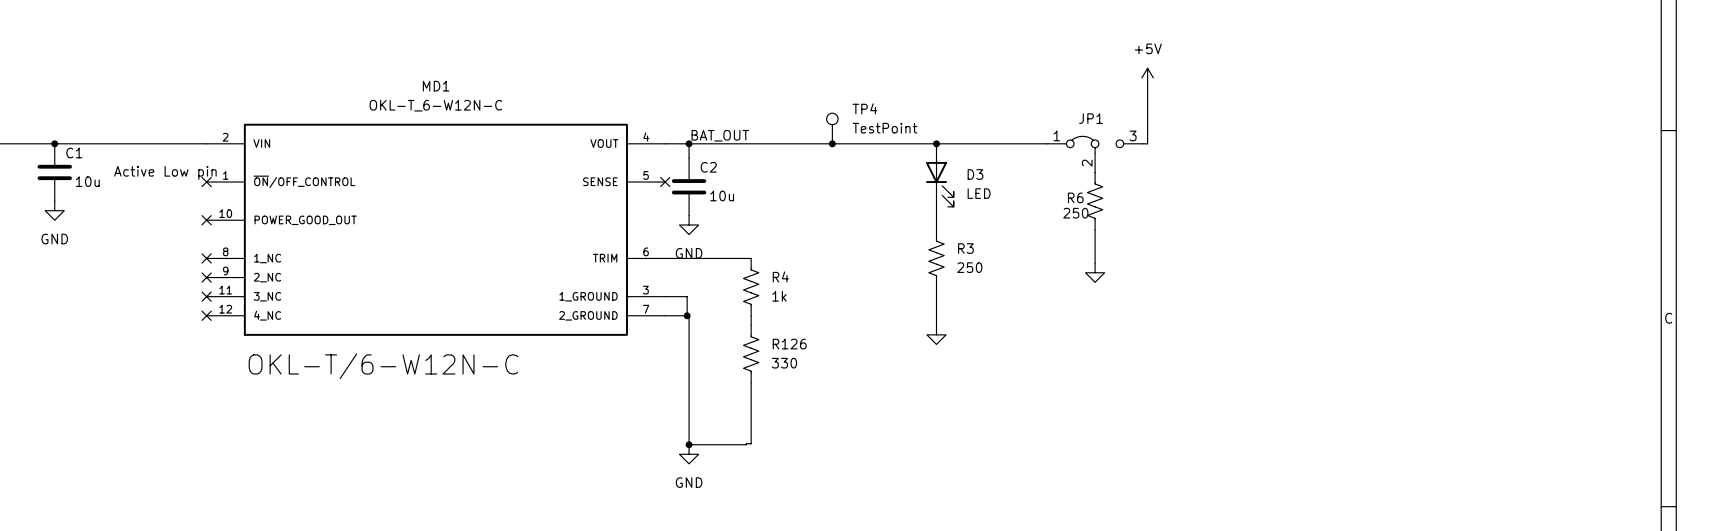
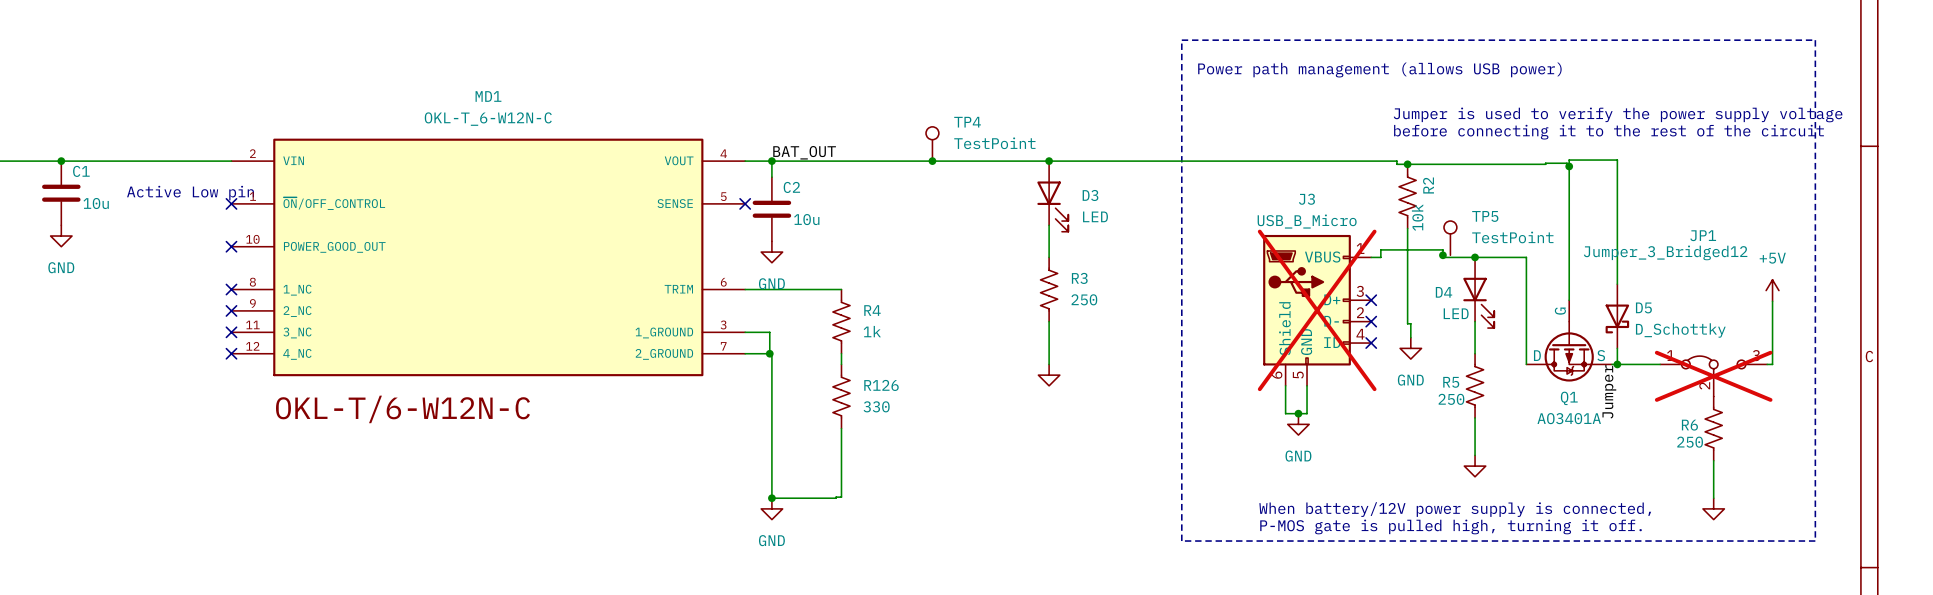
line: none -> (1181, 40) (1815, 40) (1815, 541) (1181, 541) (1181, 40)
text: none -> Power path management (allows USB power) (1379, 70)
power symbol: +5V (1147, 77) -> none
wire: (1147, 87) (1147, 143) -> (1569, 166) (1567, 166) (1567, 163) (1396, 164) (1396, 161) (1285, 161)
text: none -> Jumper is used to verify the power supply voltage (1618, 114)
JP1 name position: JP1 (1091, 118) -> JP1 (1703, 235)
text: none -> before connecting it to the rest of the circuit (1608, 132)
wire: none -> (1173, 161) (1280, 161)
junction: none -> (1407, 164)
junction: none -> (1569, 166)
JP1 position: (1095, 154) -> (1713, 376)
R2: none -> 10k (1407, 196)
R6 position: (1095, 201) -> (1713, 428)
wire: none -> (1407, 228) (1407, 323) (1410, 323) (1410, 337)
TP5: none -> TestPoint (1450, 238)
JP1 value: none -> Jumper_3_Bridged12 (1665, 252)
junction: none -> (1442, 255)
wire: (1095, 229) (1095, 263) -> none
wire: none -> (1371, 257) (1380, 257) (1380, 249) (1442, 249) (1442, 257) (1526, 257) (1526, 364)
junction: none -> (1475, 257)
wire: none -> (1617, 284) (1617, 160) (1569, 160) (1569, 300)
power symbol: none -> +5V (1772, 290)
D4: none -> LED (1478, 292)
no-connect mark: none -> (1371, 300)
wire: none -> (1772, 301) (1772, 364) (1767, 364)
power symbol: (1095, 272) -> none
J3: none -> USB_B_Micro (1317, 310)
D5: none -> D_Schottky (1617, 316)
no-connect mark: none -> (1371, 321)
wire: none -> (1475, 321) (1475, 353)
Q1: none -> AO3401A (1569, 340)
no-connect mark: none -> (1371, 343)
power symbol: none -> GND (1410, 348)
wire: none -> (1617, 348) (1617, 364)
wire: none -> (1612, 364) (1660, 364)
junction: none -> (1617, 364)
JP1 do-not-place cross: none -> (1713, 376)
wire: none -> (1285, 385) (1285, 413) (1307, 413) (1307, 385)
R5: none -> 250 (1475, 385)
label: none -> Jumper (1609, 391)
junction: none -> (1298, 413)
wire: none -> (1475, 417) (1475, 455)
power symbol: none -> GND (1298, 424)
wire: none -> (1713, 460) (1713, 498)
power symbol: none -> (1475, 466)
power symbol: none -> (1713, 508)
text: none -> When battery/12V power supply is connected, (1455, 509)
text: none -> P-MOS gate is pulled high, turning it off. (1451, 526)

